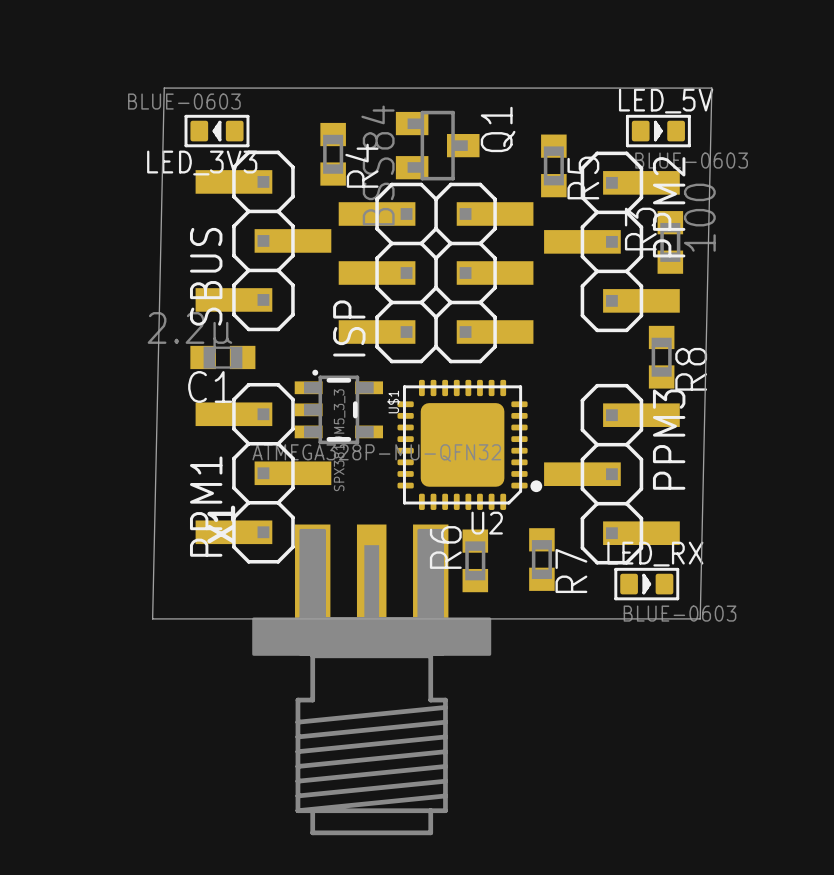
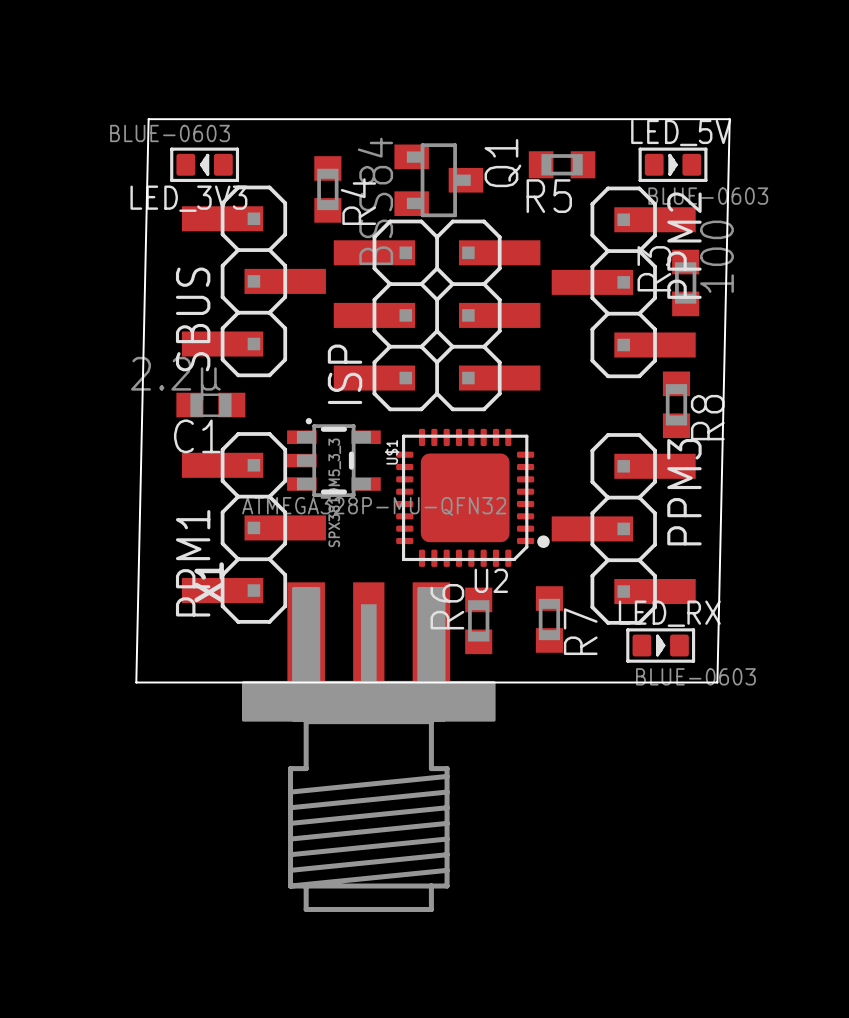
R5 rotation: 0° (553, 165) -> 90° clockwise (562, 164)

